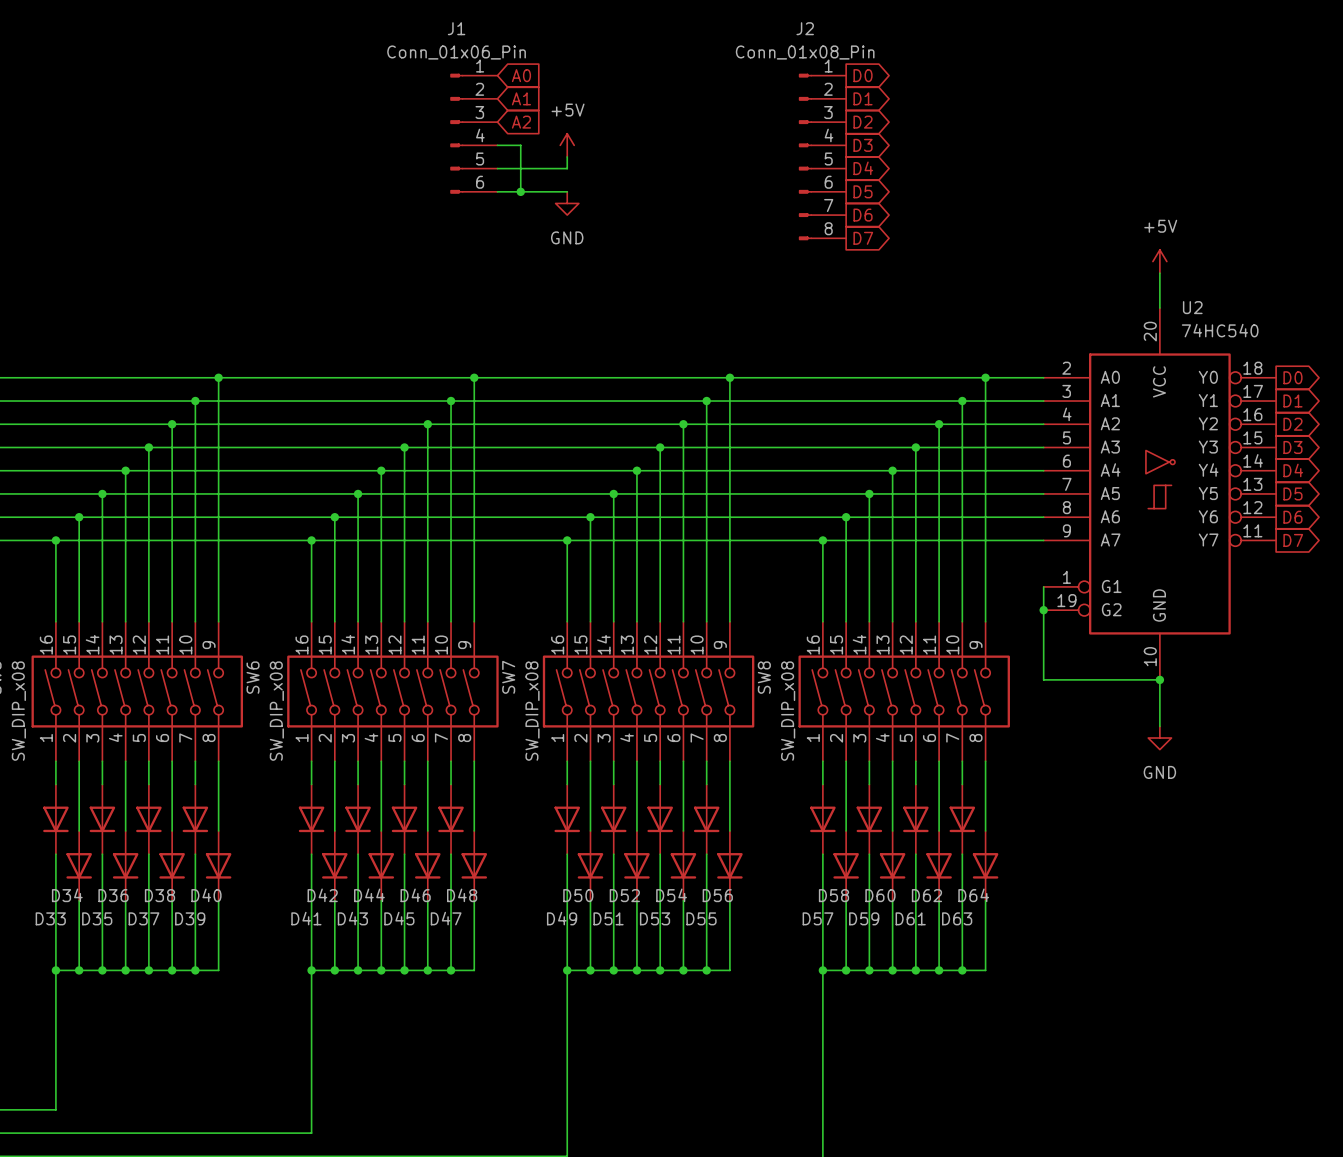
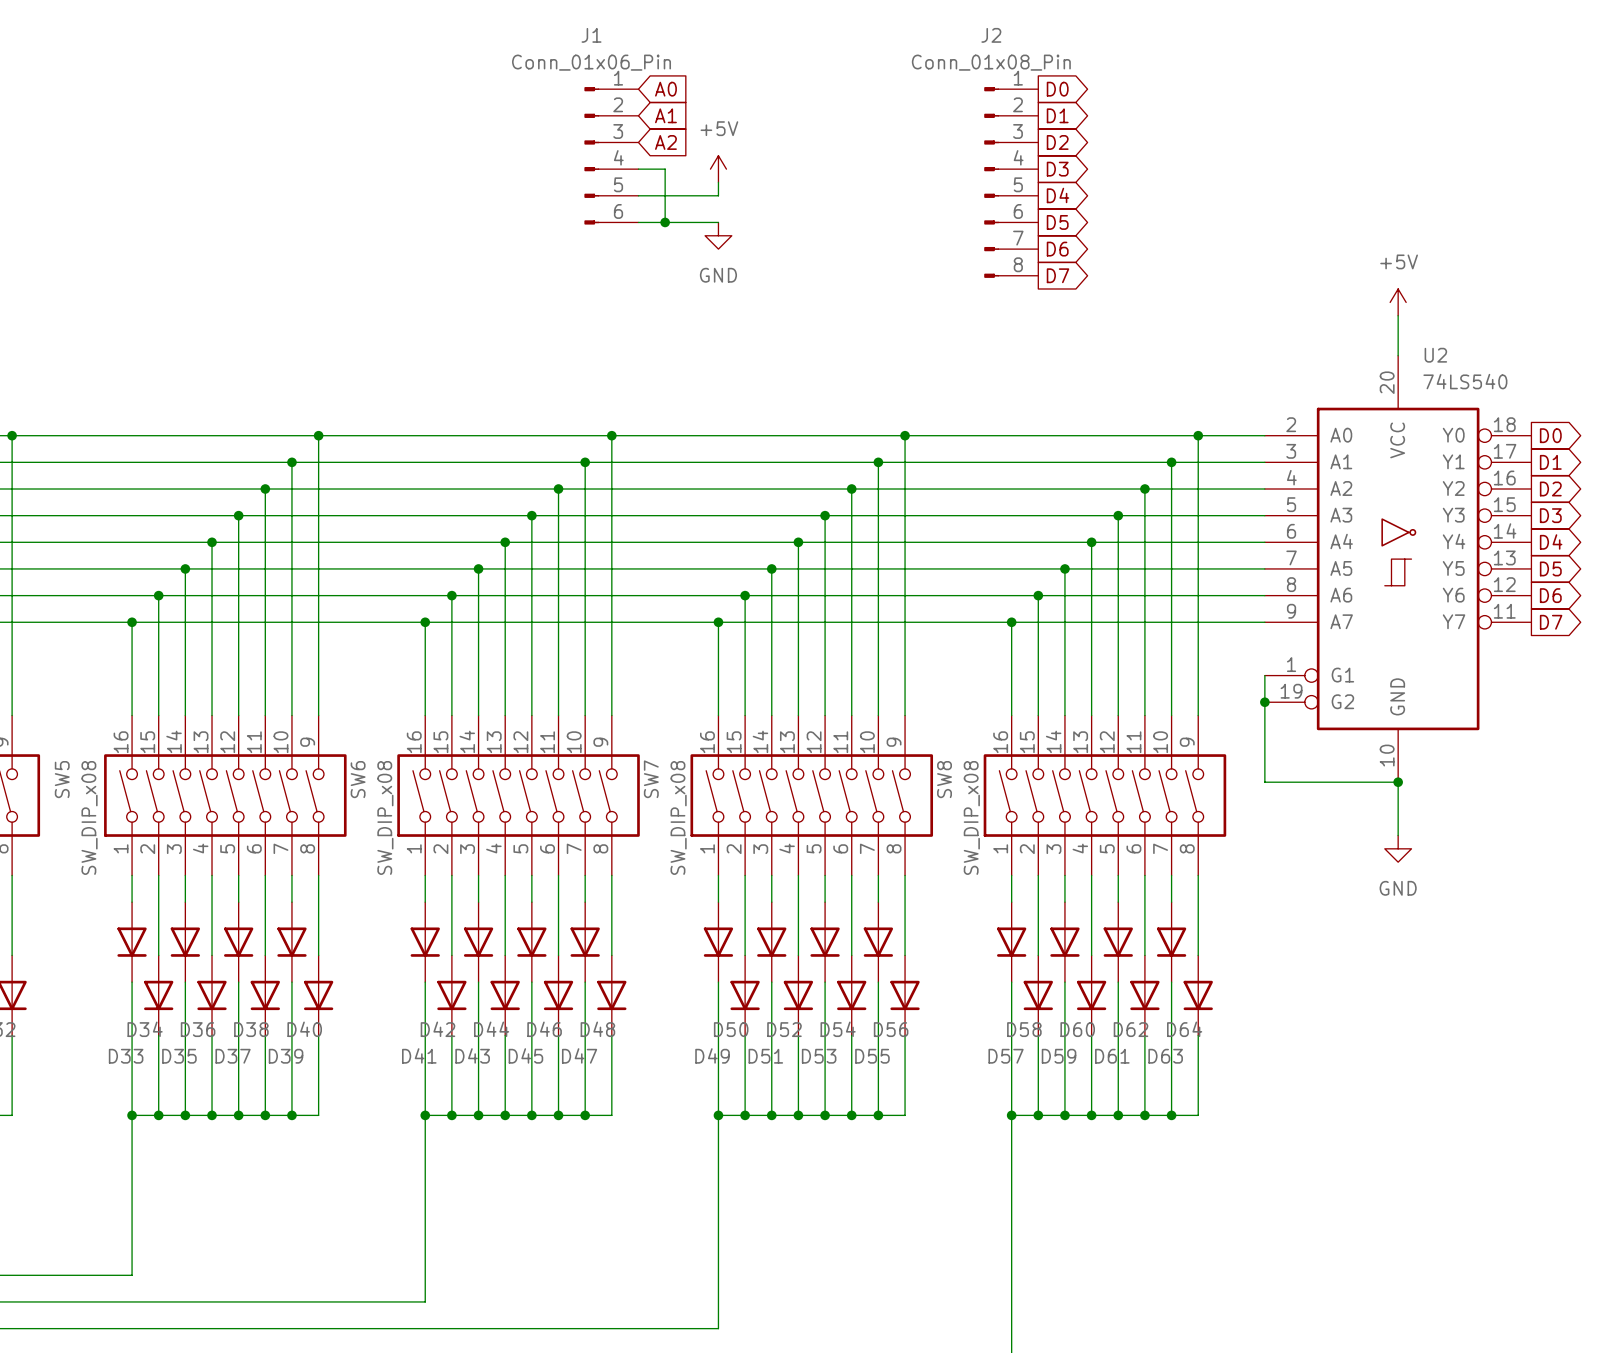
U2 value: 74HC540 (1220, 330) -> 74LS540 (1465, 381)

